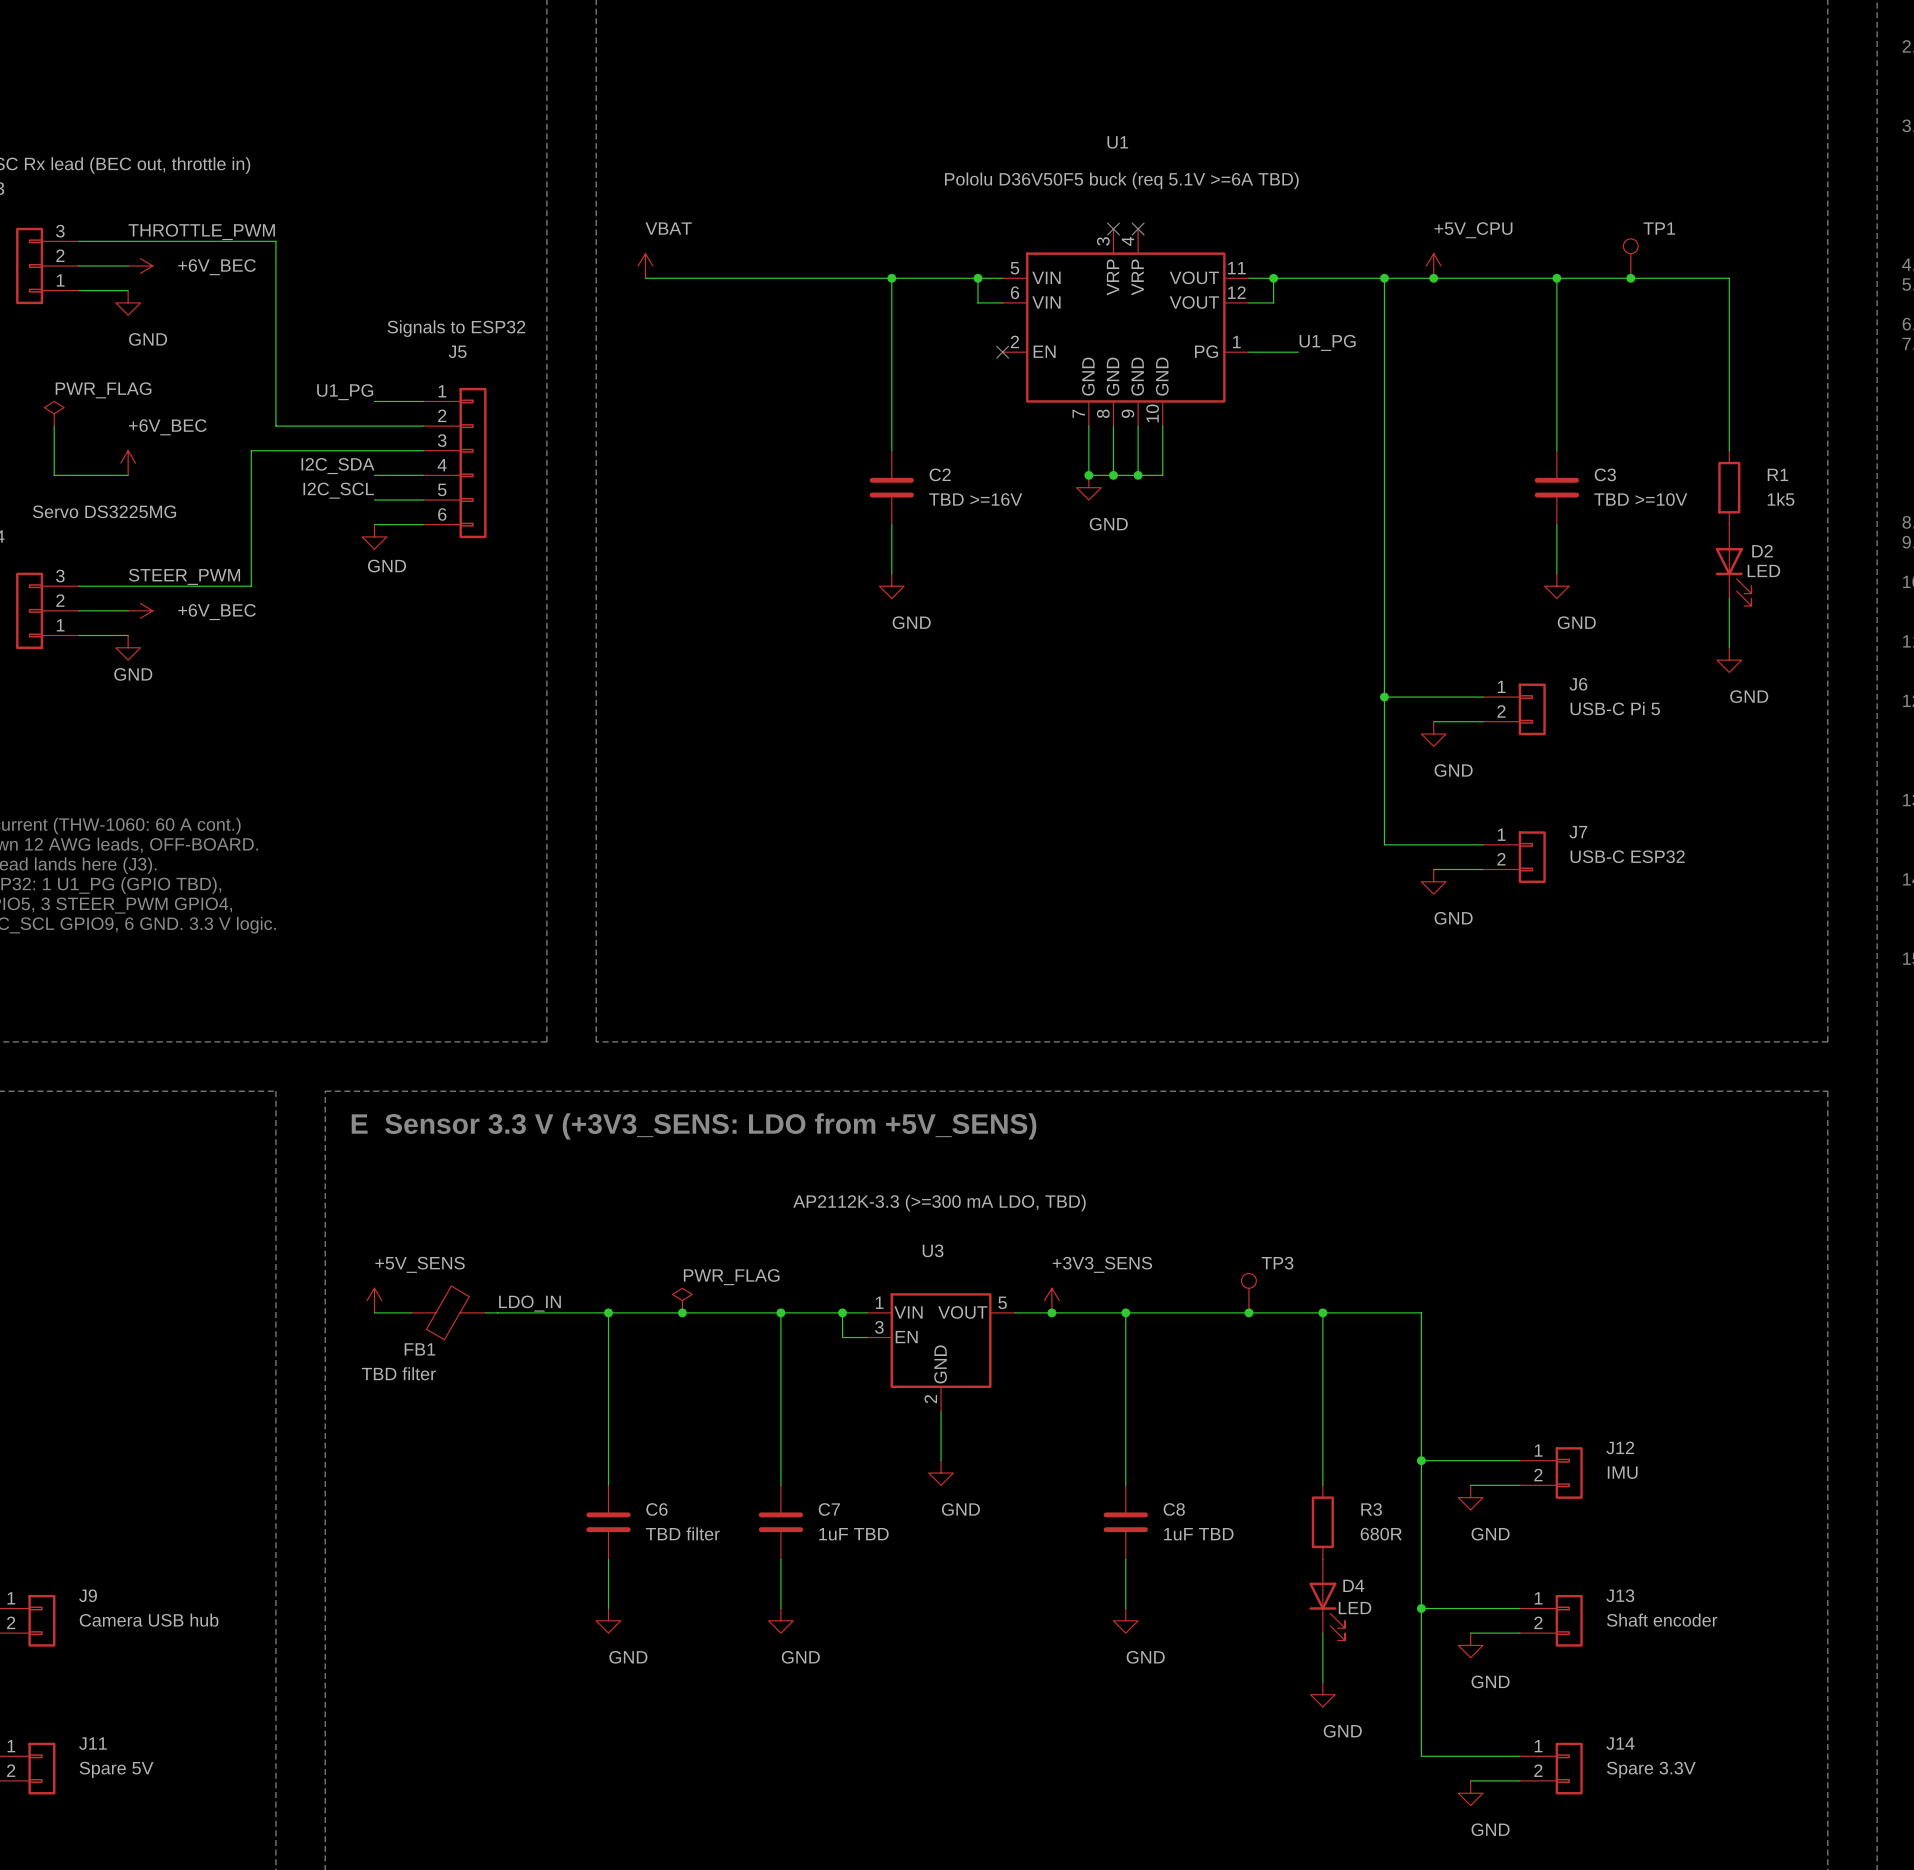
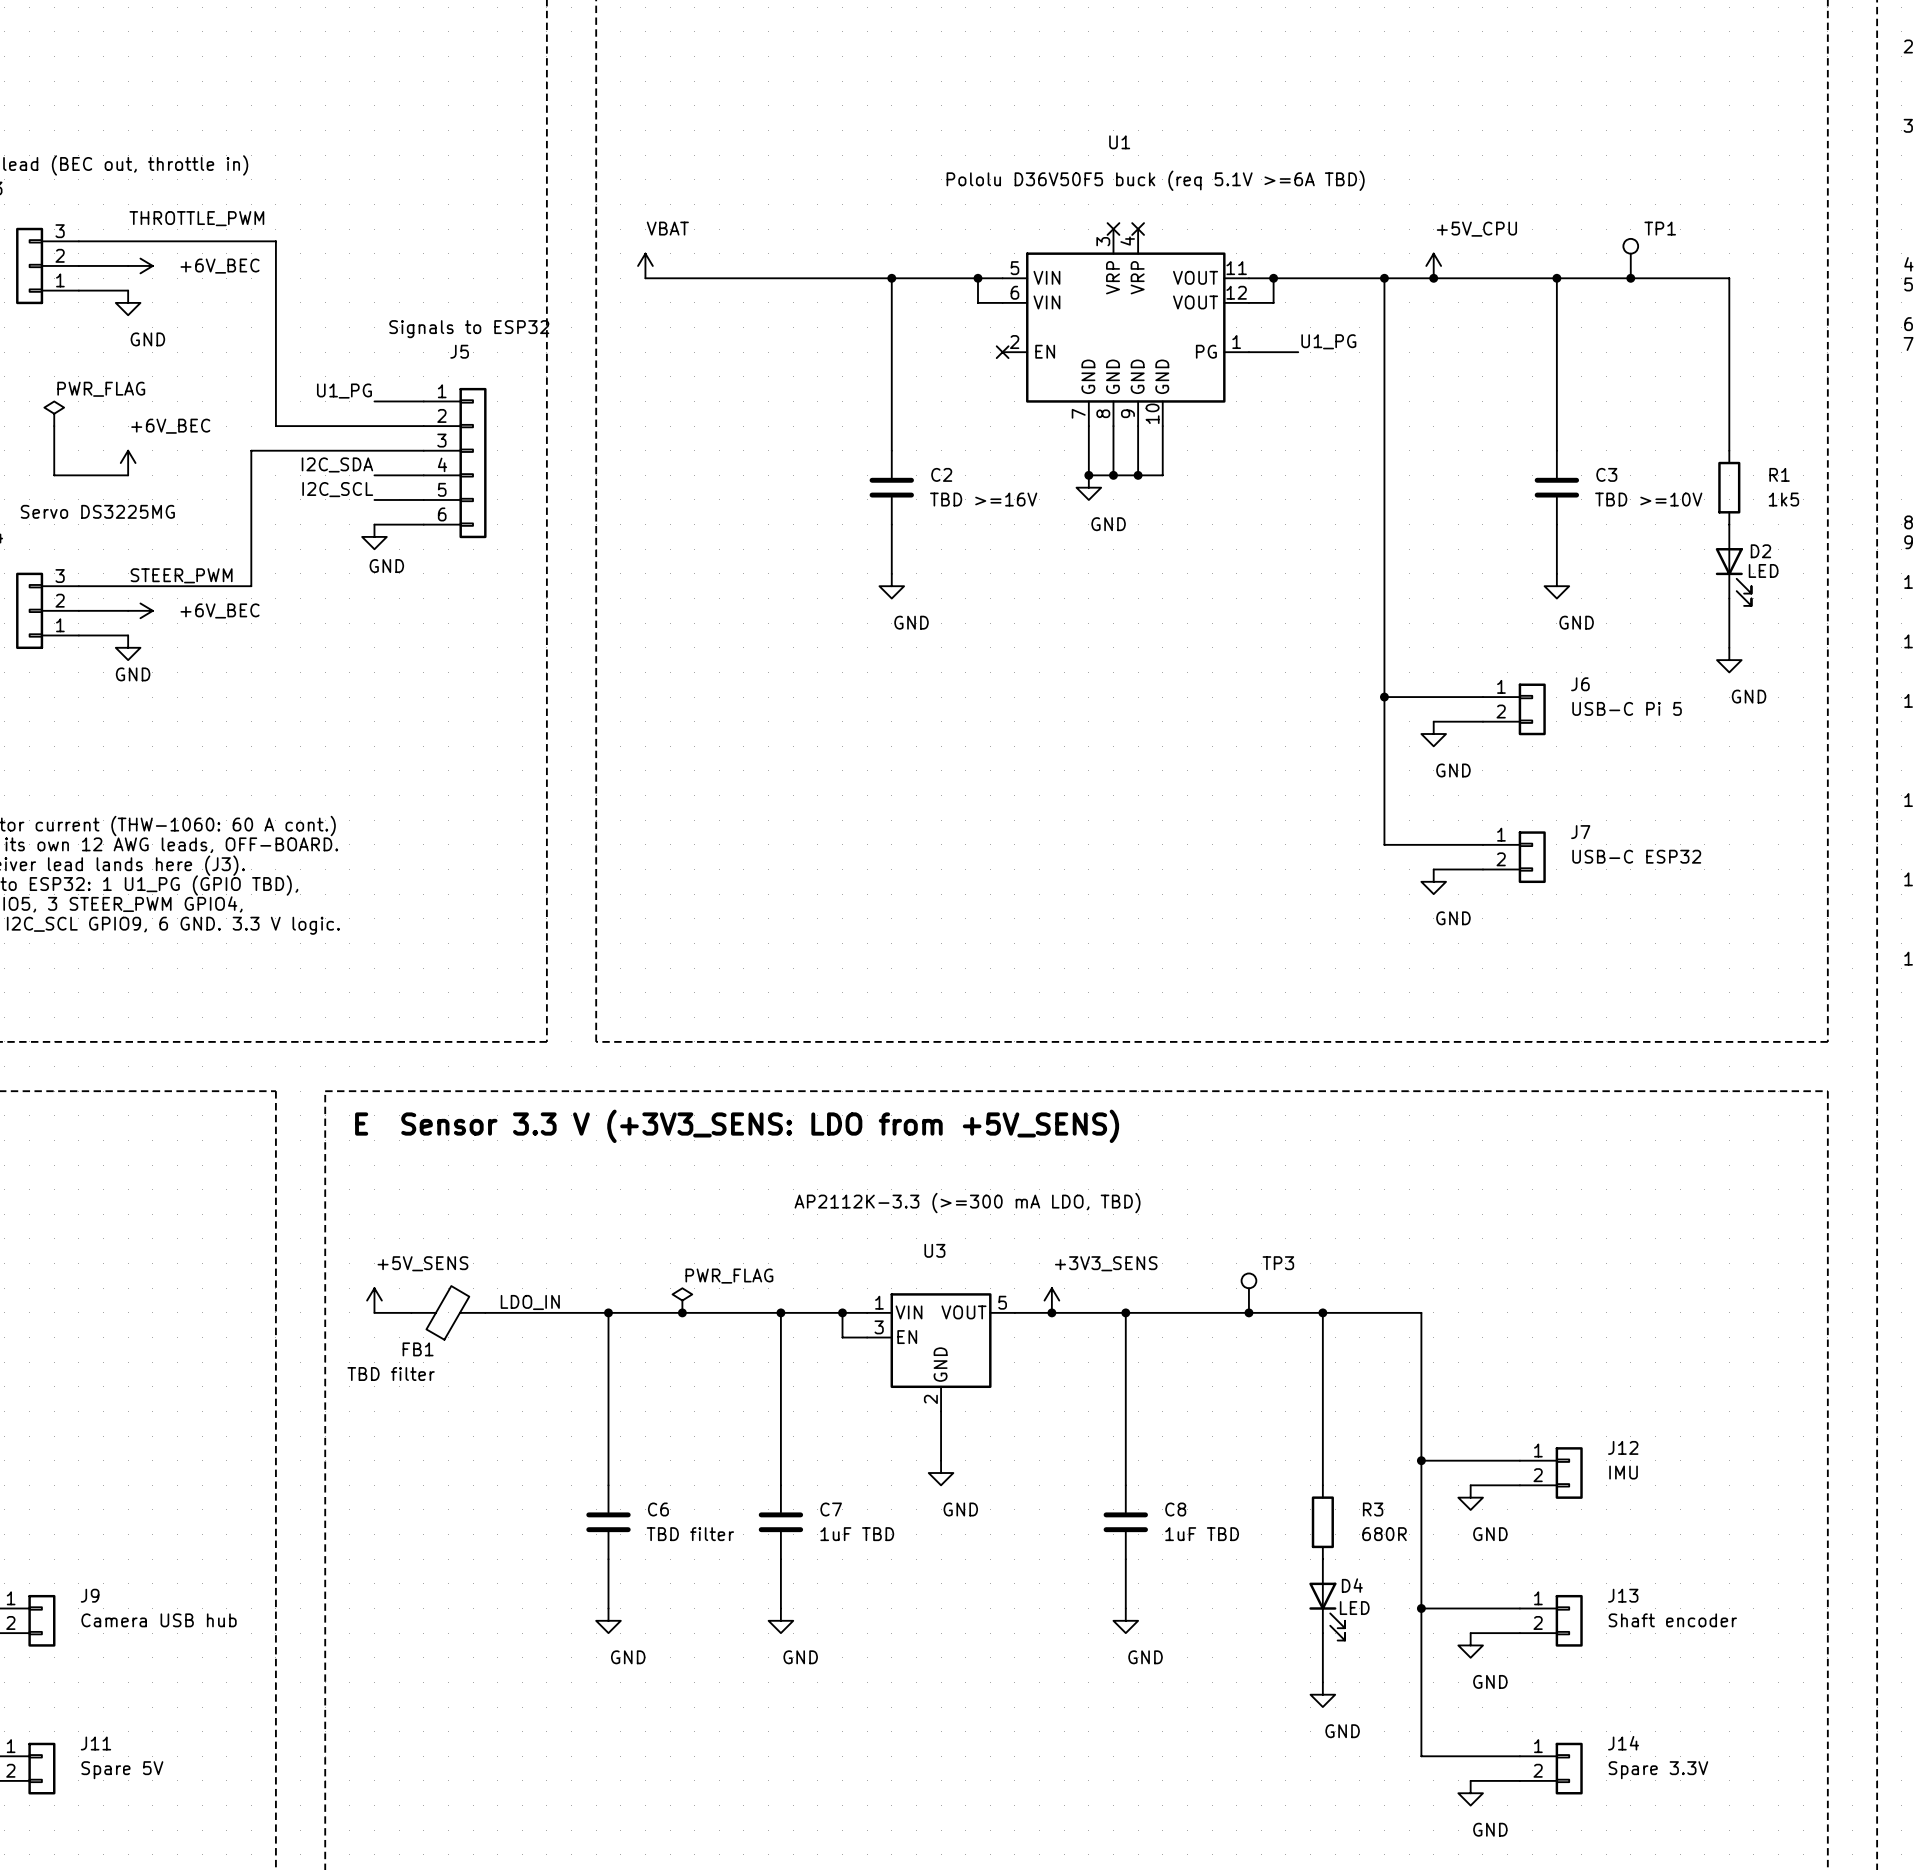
label position: THROTTLE_PWM (201, 232) -> THROTTLE_PWM (196, 218)

